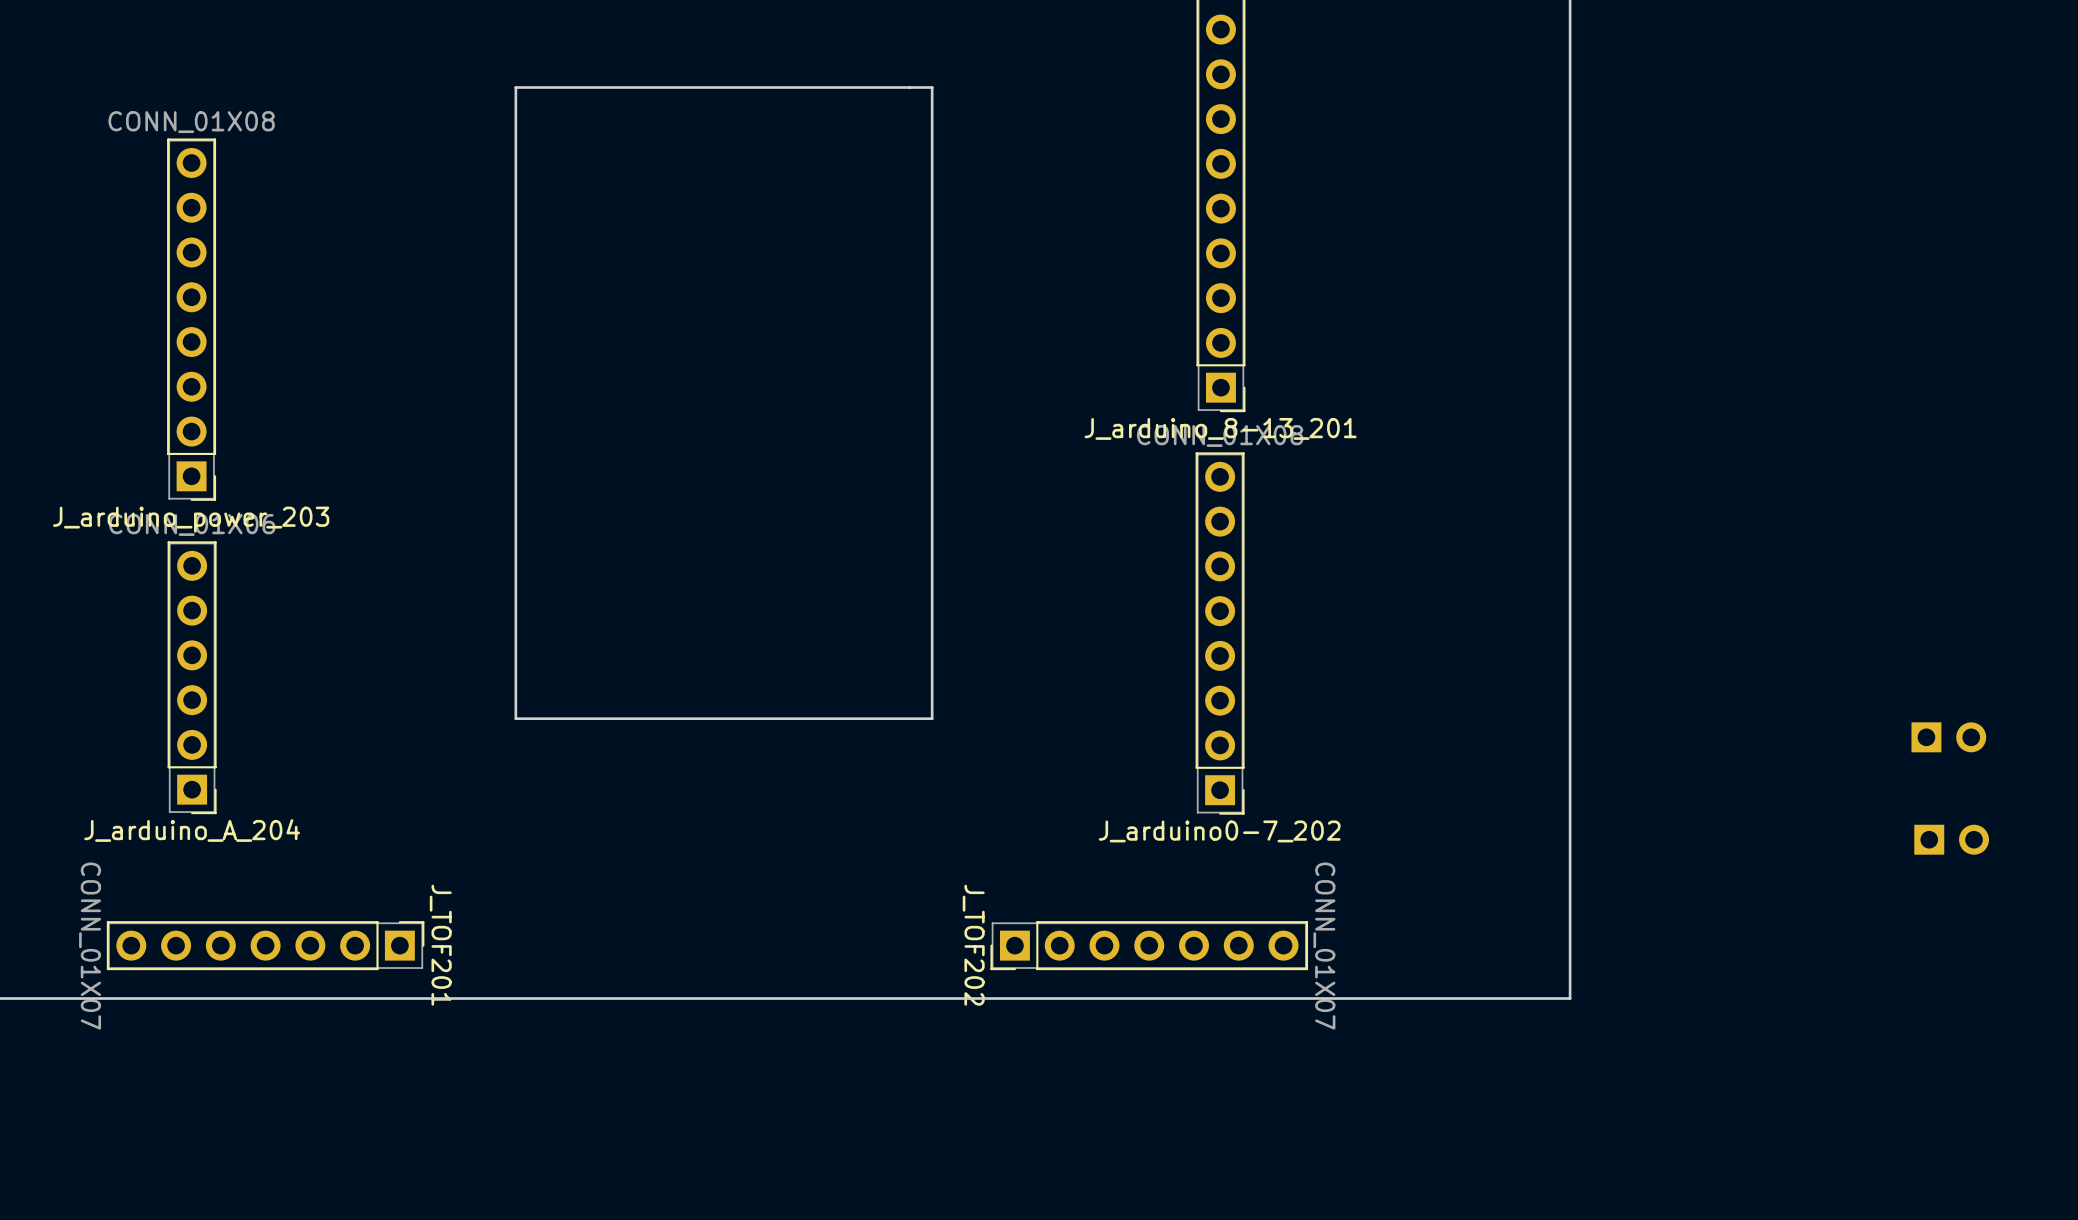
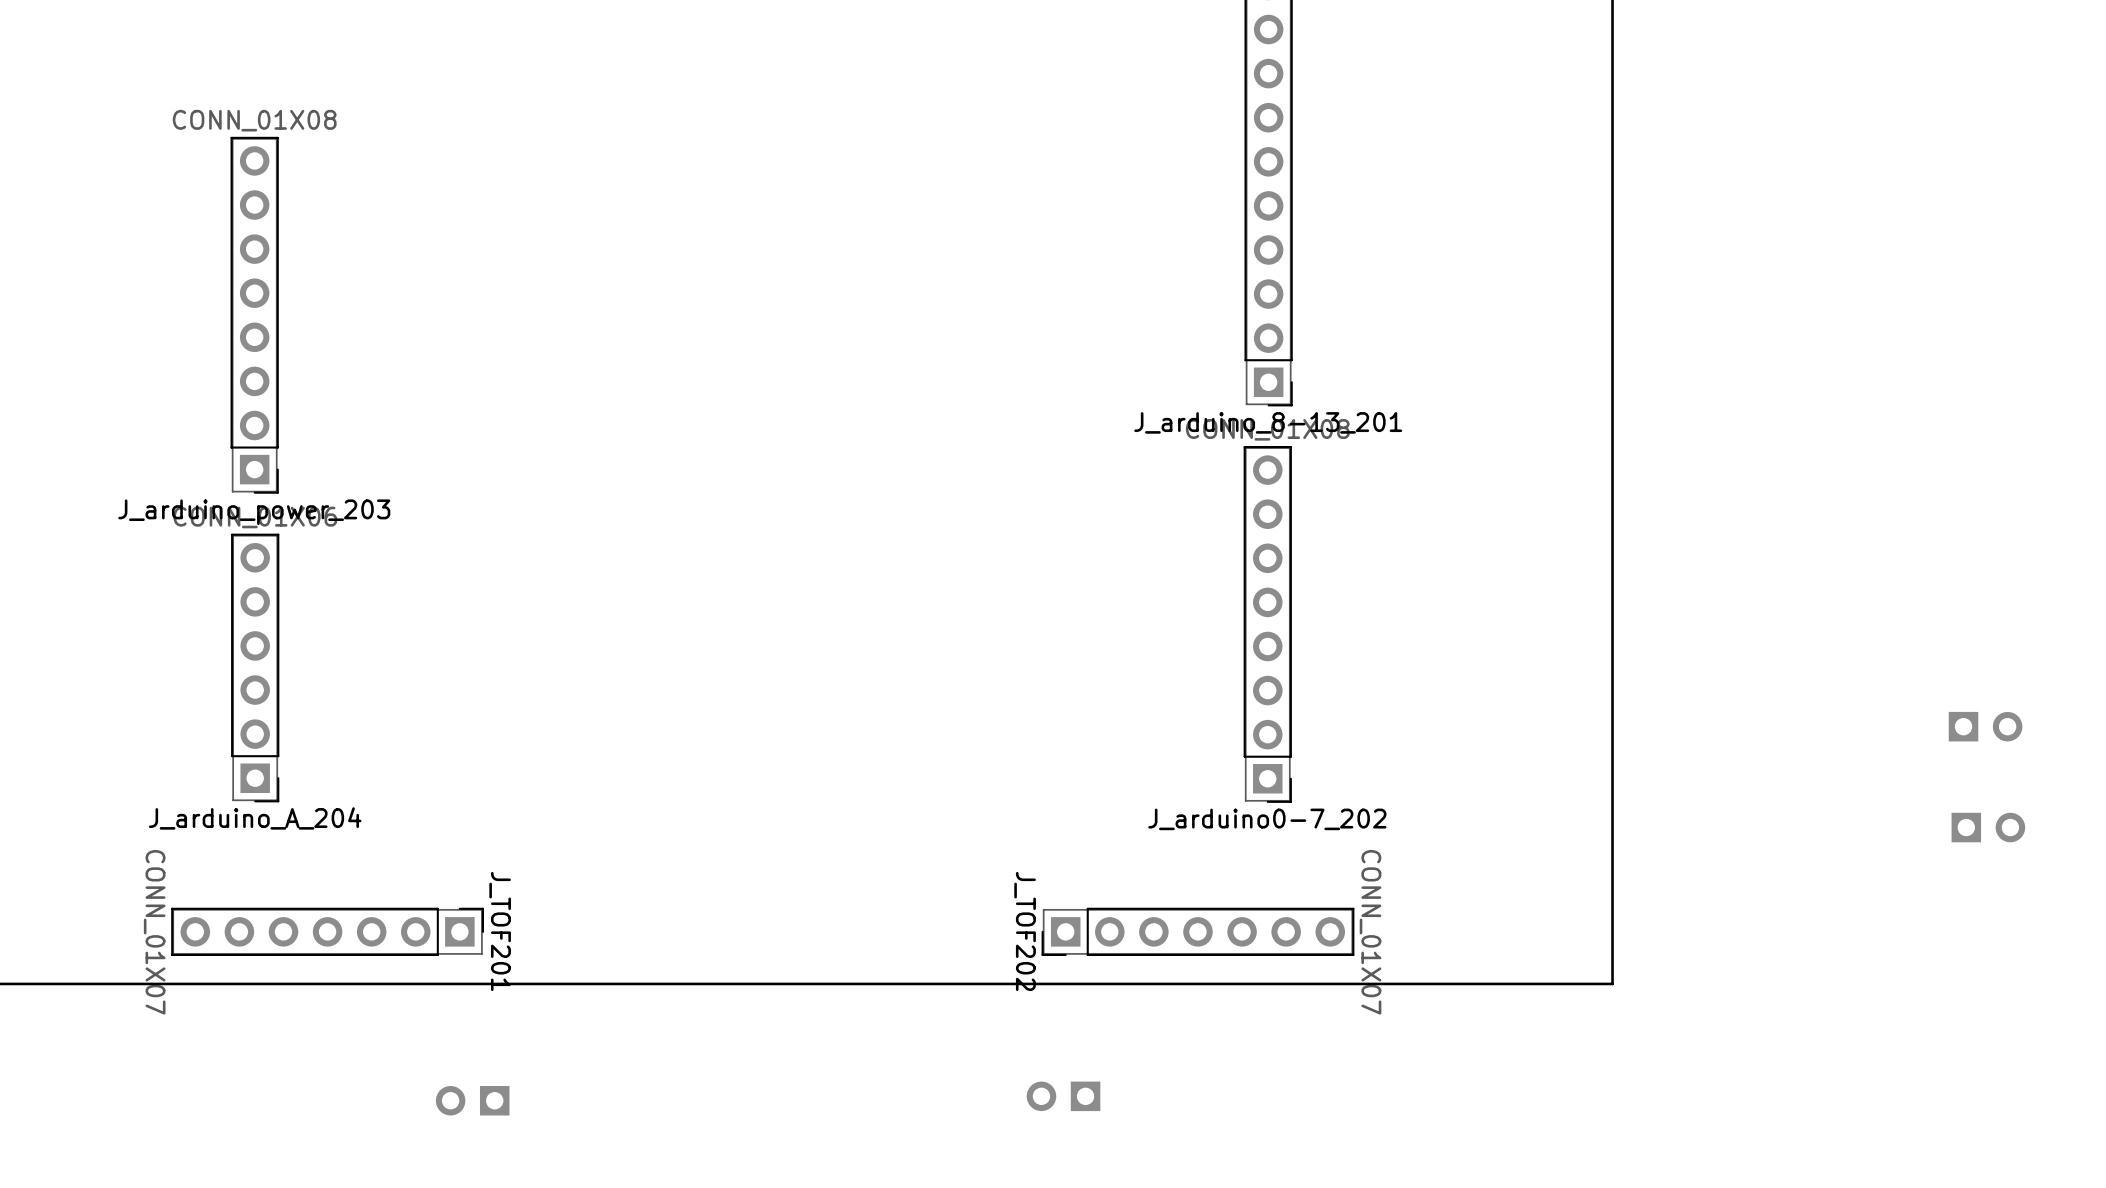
board edge: (932, 87) (515, 87) (515, 718) (932, 718) (932, 87) -> none
part: none -> (1063, 1096)
part: none -> (472, 1100)

